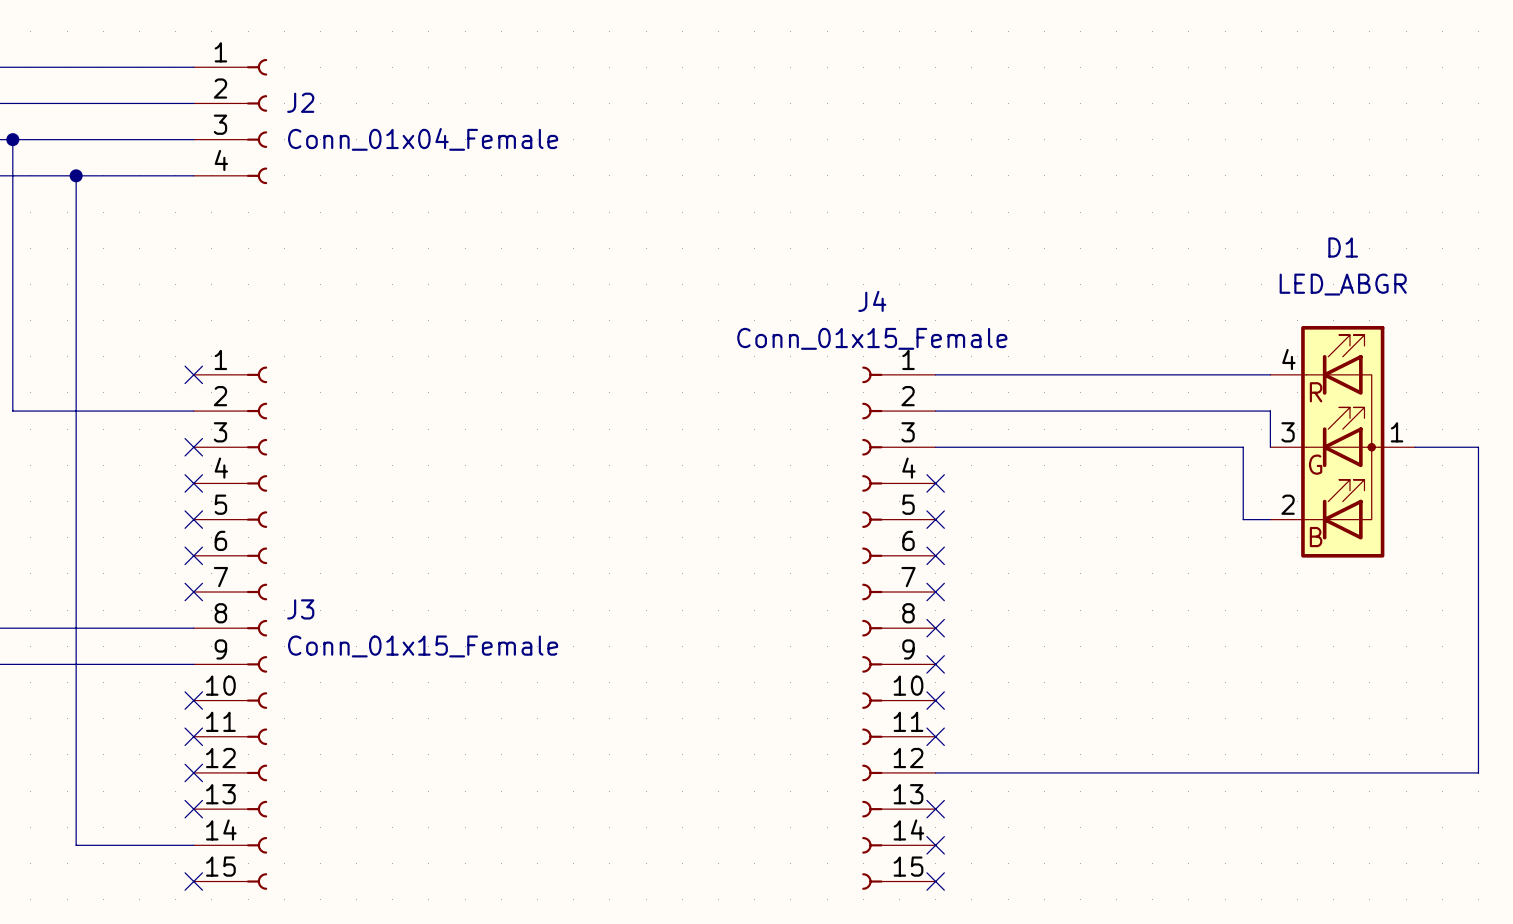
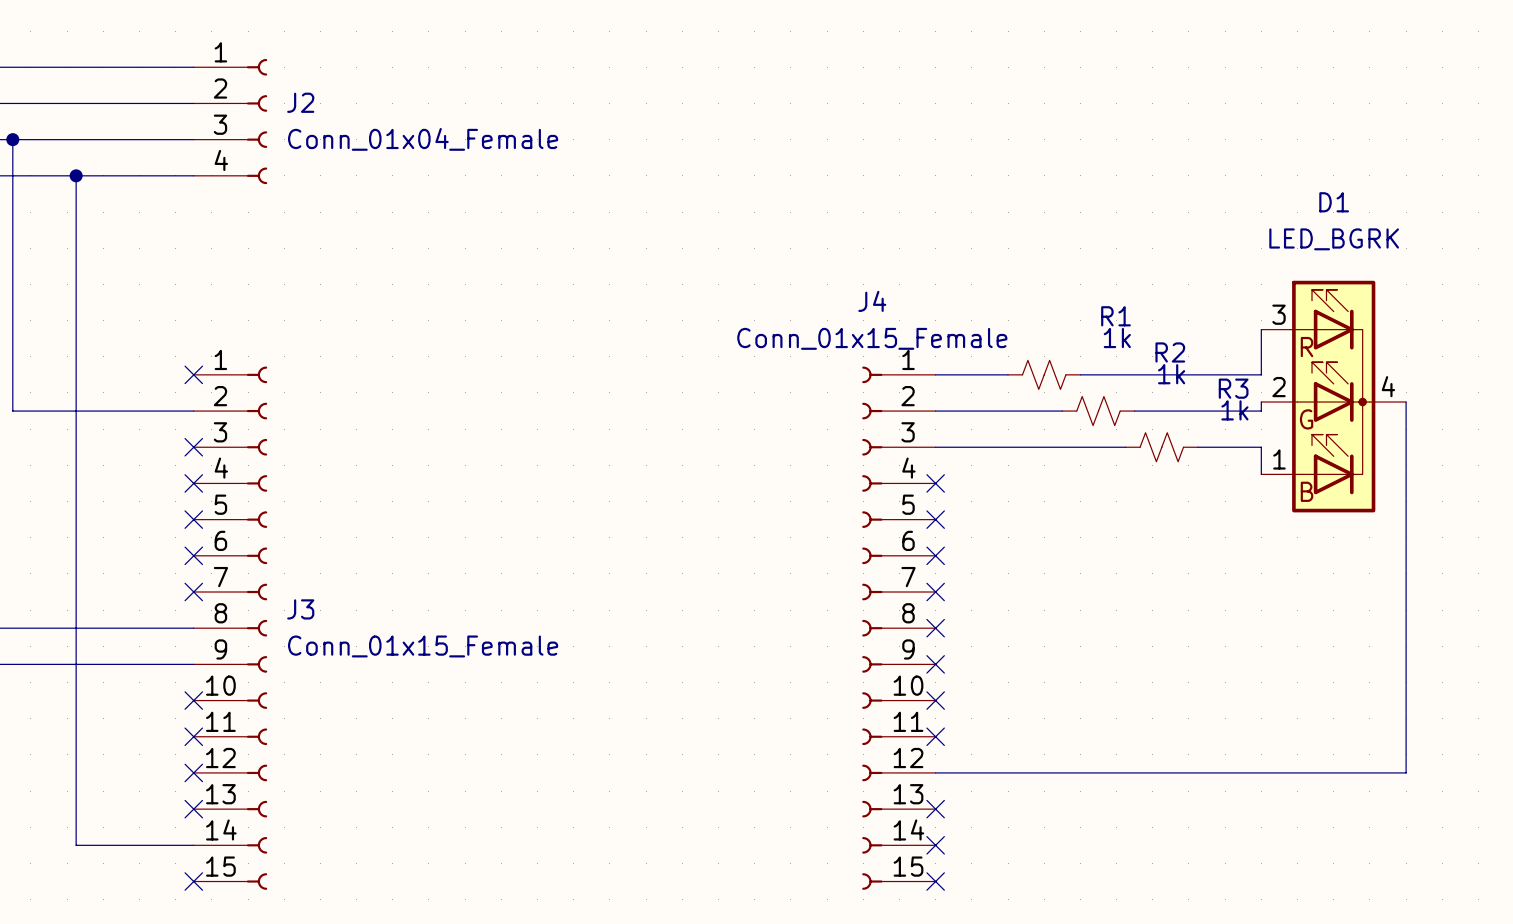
D1 value: LED_ABGR (1343, 284) -> LED_BGRK (1334, 239)
D1 symbol: [1270, 326, 1416, 558] -> [1261, 280, 1407, 513]
wire: (1008, 374) (1080, 374) -> none
R1: none -> 1k (1044, 374)
wire: (1261, 374) (1270, 374) -> (1261, 374) (1261, 329)
wire: (1062, 411) (1134, 411) -> none
R2: none -> 1k (1098, 411)
wire: (1261, 411) (1270, 411) (1270, 447) -> (1261, 411) (1261, 402)
wire: (1125, 447) (1198, 447) -> none
R3: none -> 1k (1161, 447)
wire: (1243, 447) (1243, 519) (1270, 519) -> (1243, 447) (1261, 447) (1261, 474)
wire: (1415, 447) (1478, 447) (1478, 772) (1406, 772) -> (1406, 402) (1406, 772)

